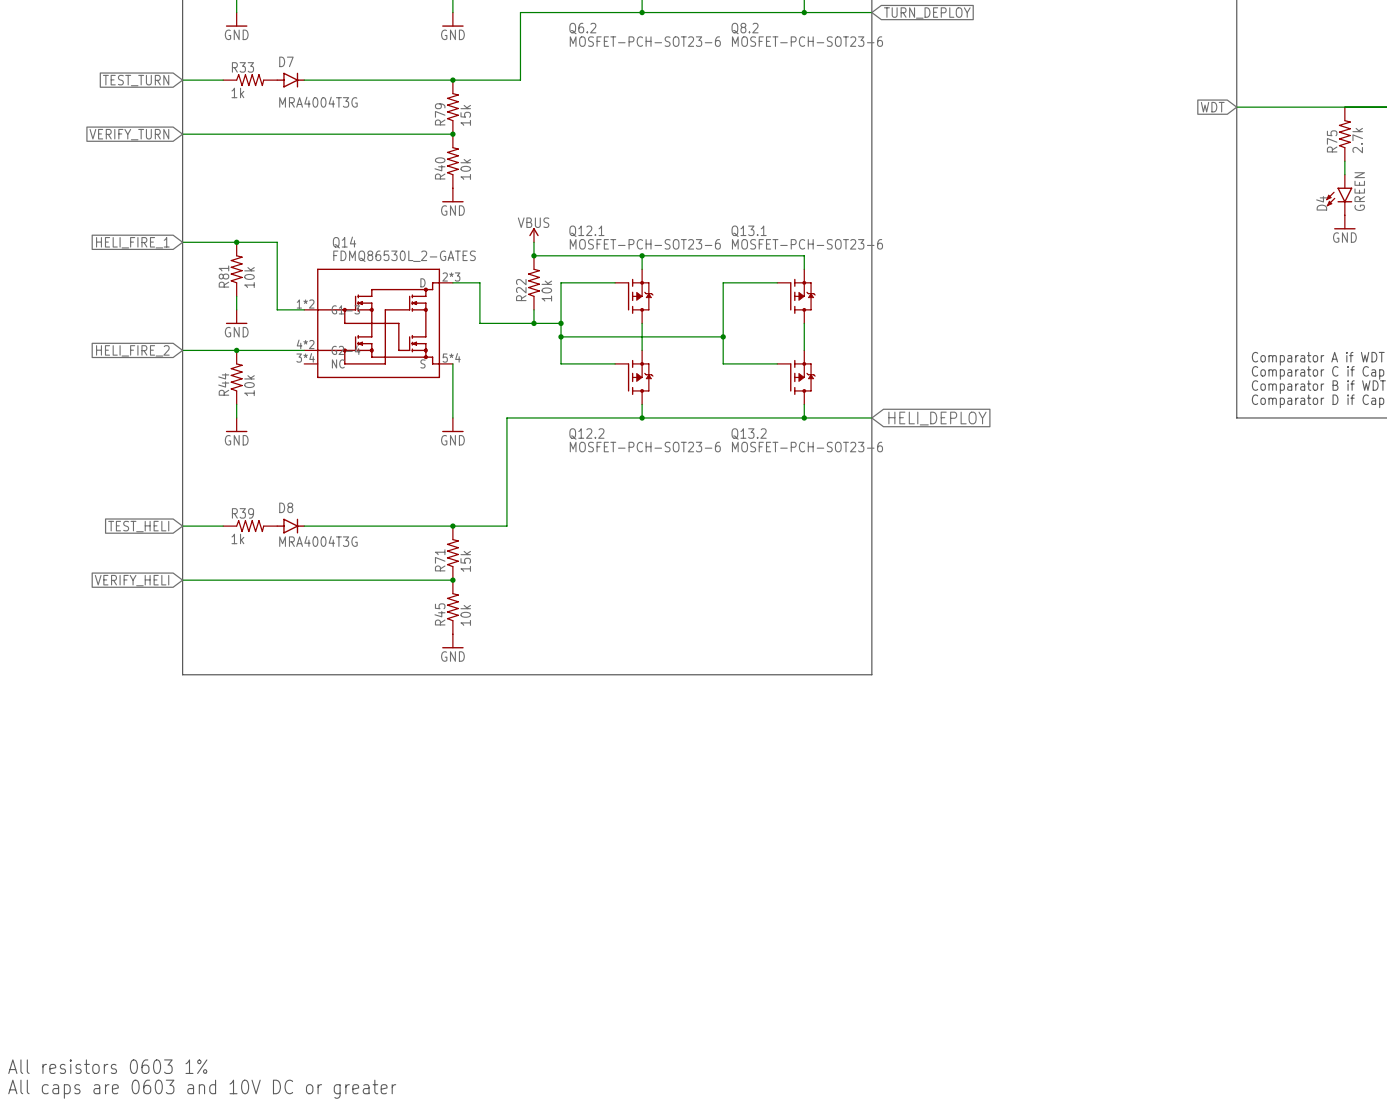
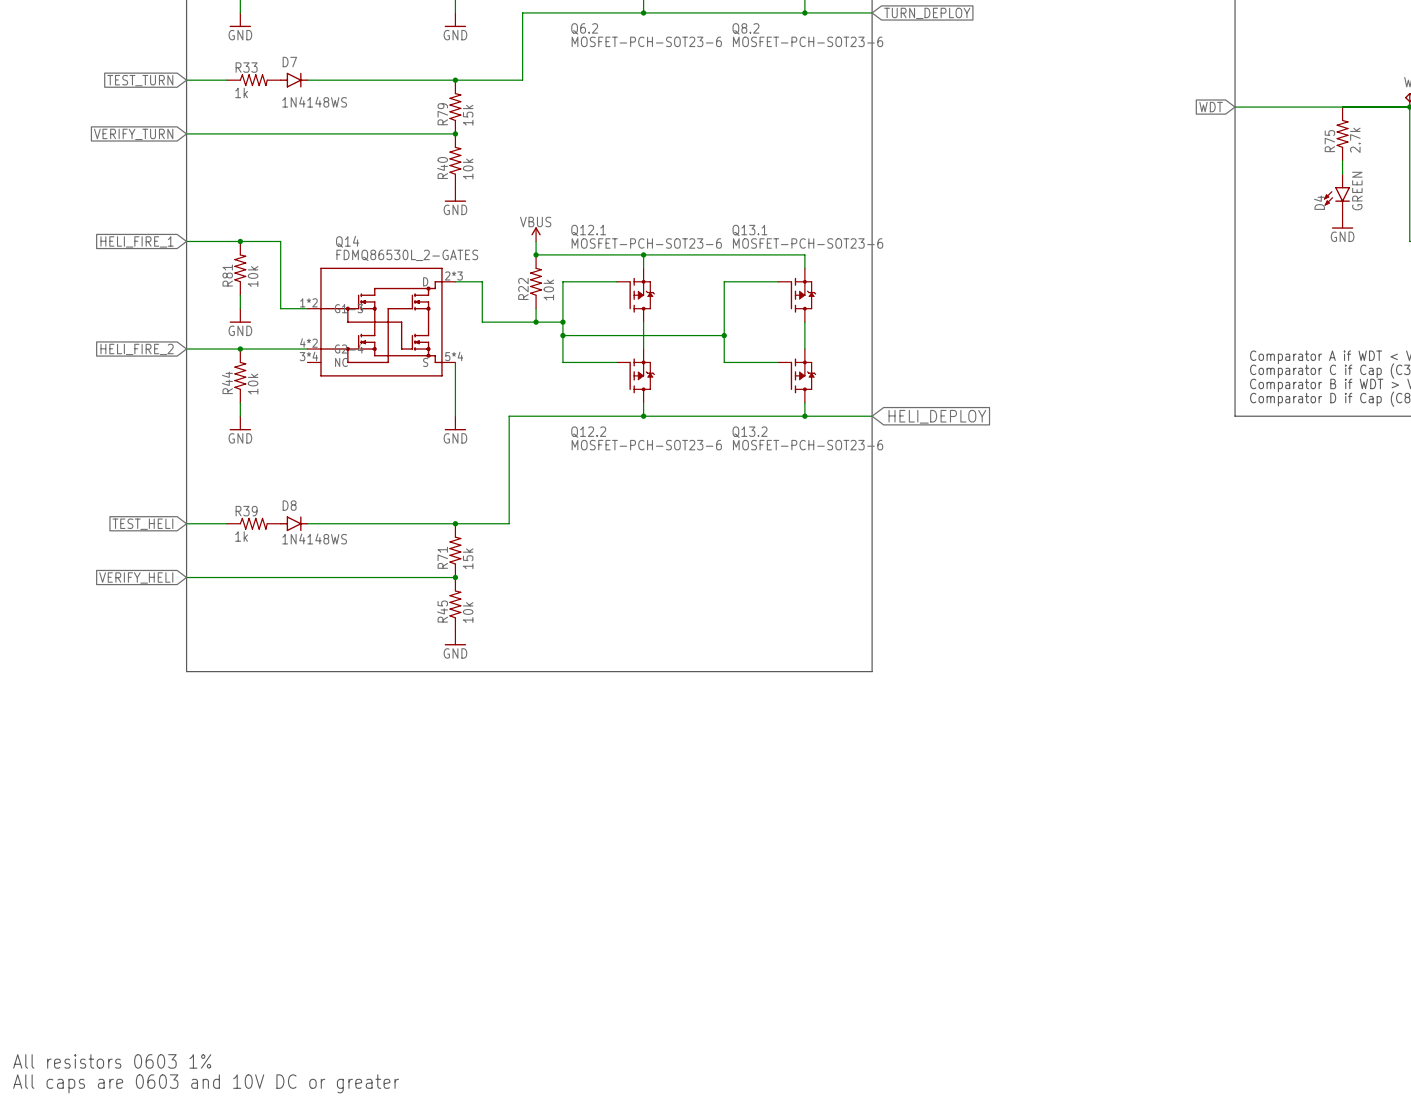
D7 value: MRA4004T3G (318, 102) -> 1N4148WS (314, 102)
D8 value: MRA4004T3G (318, 541) -> 1N4148WS (314, 538)

